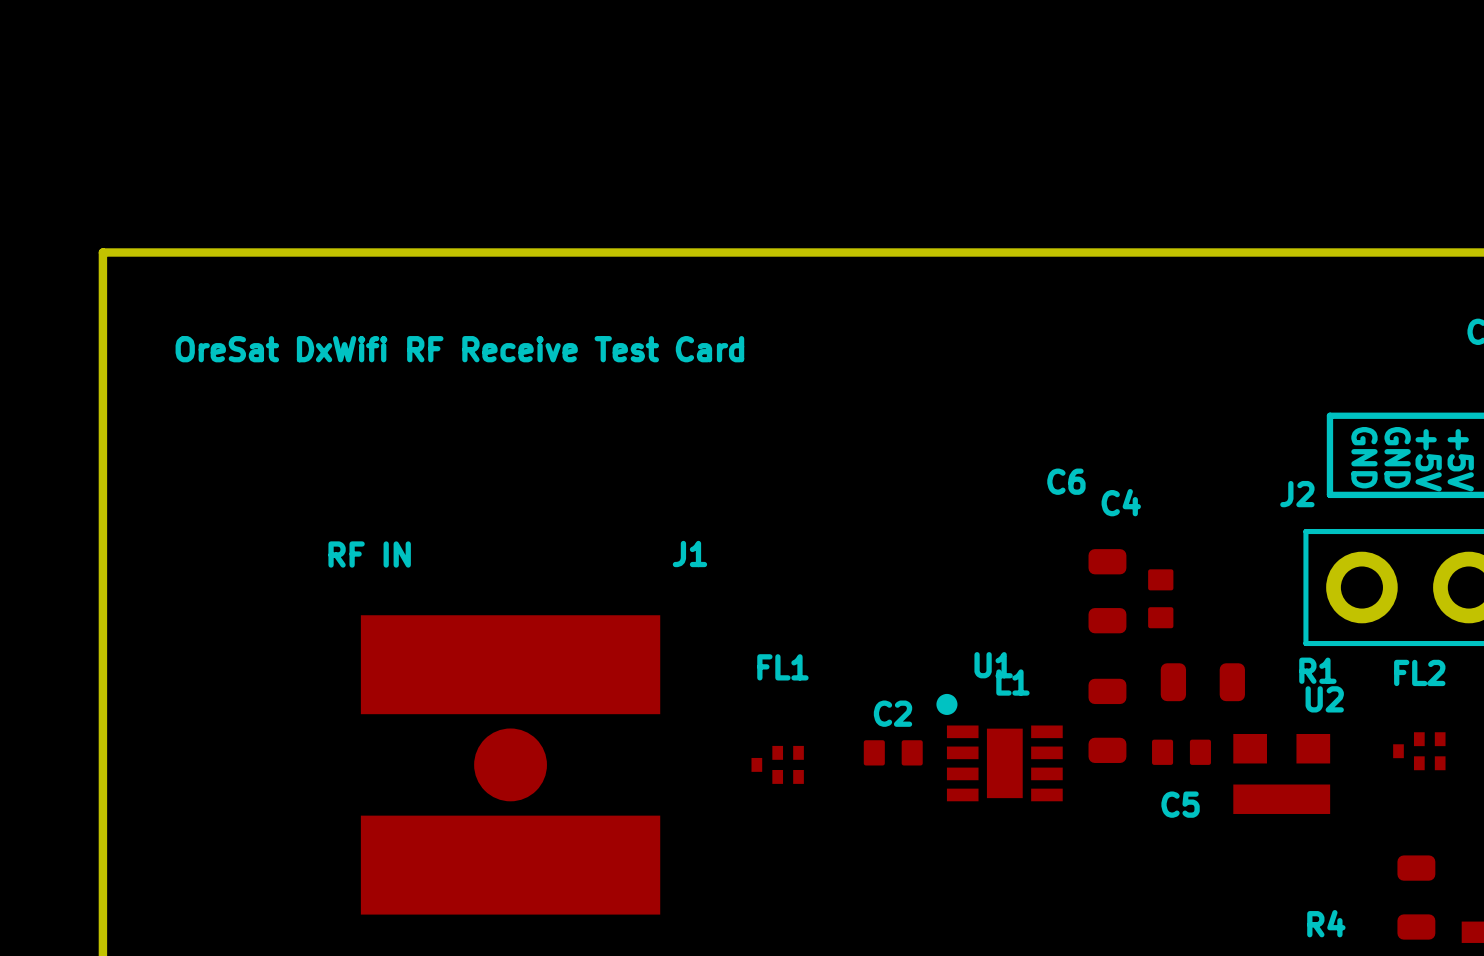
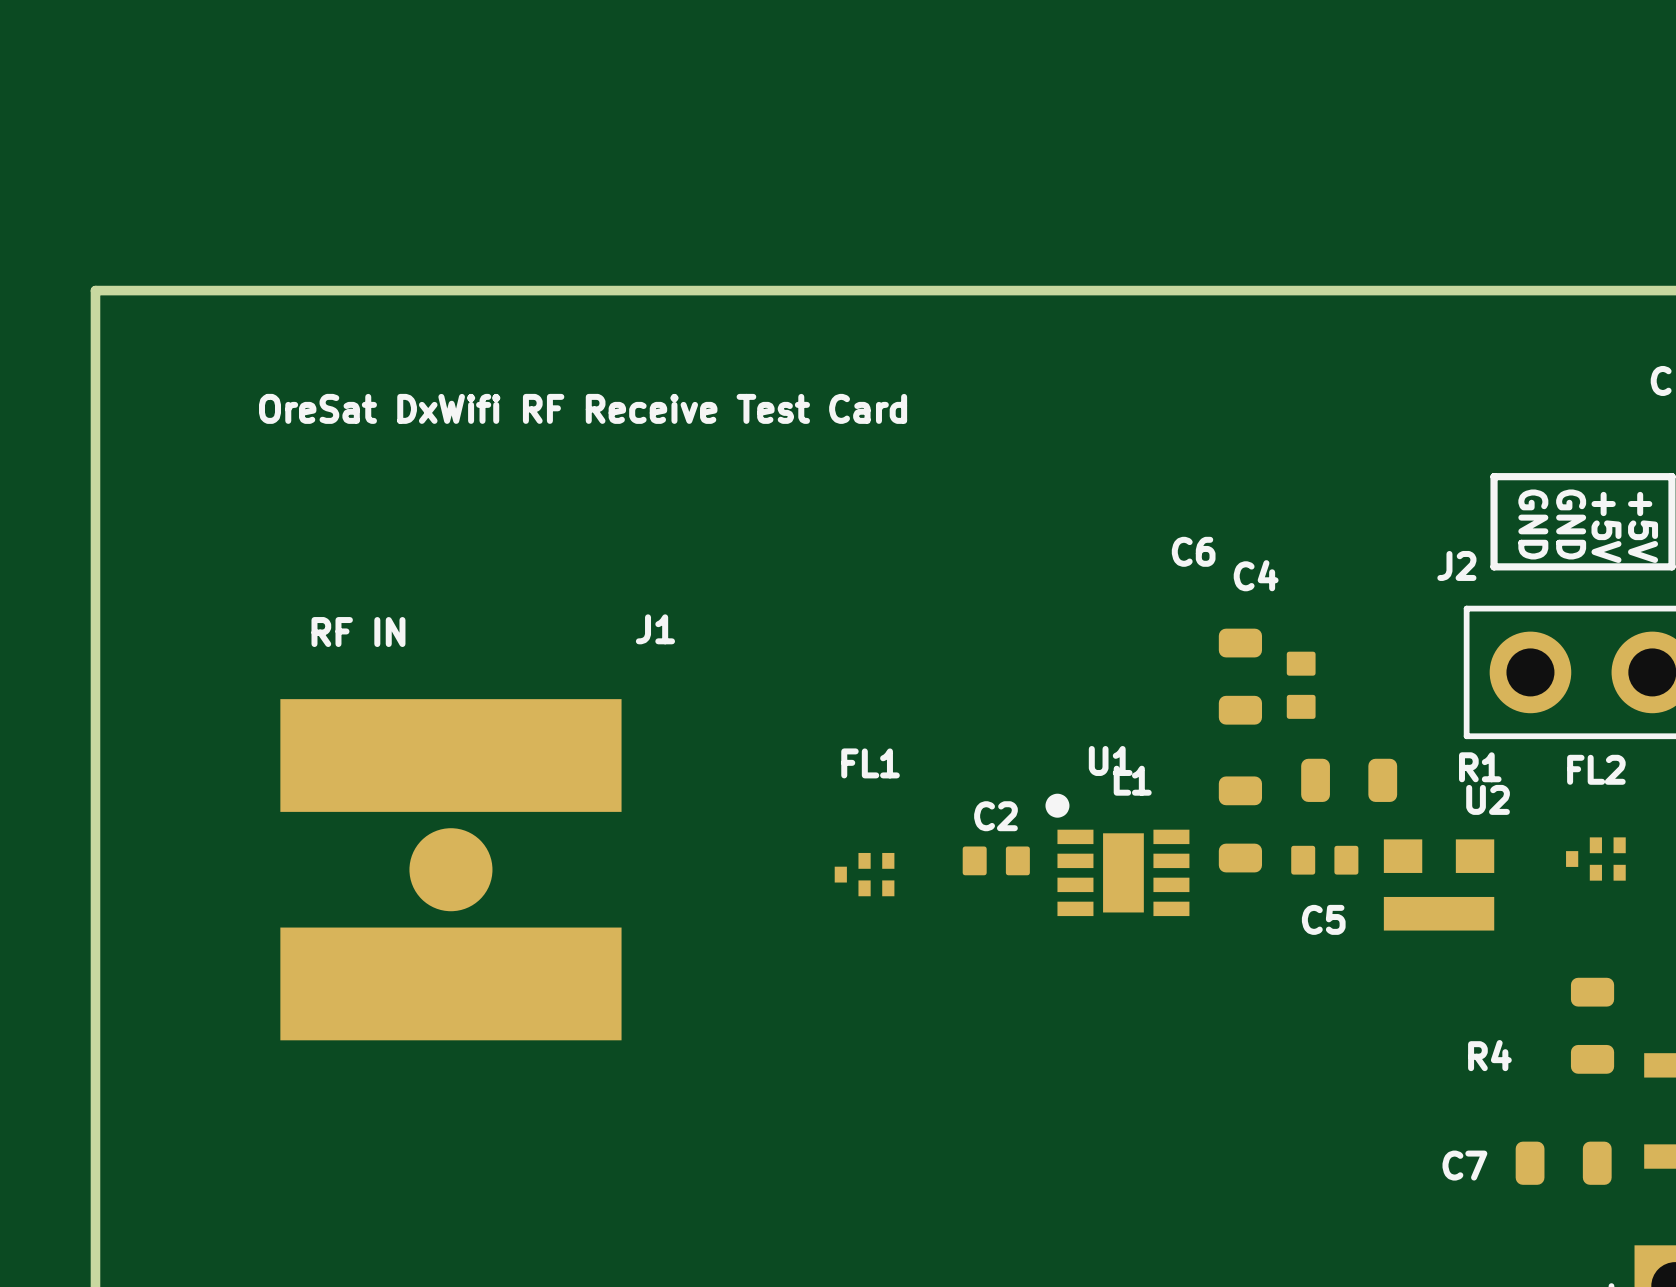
text position: OreSat DxWifi RF Receive Test Card (459, 349) -> OreSat DxWifi RF Receive Test Card (583, 408)
text position: RF IN (369, 554) -> RF IN (358, 632)
J1 position: (510, 764) -> (450, 869)

